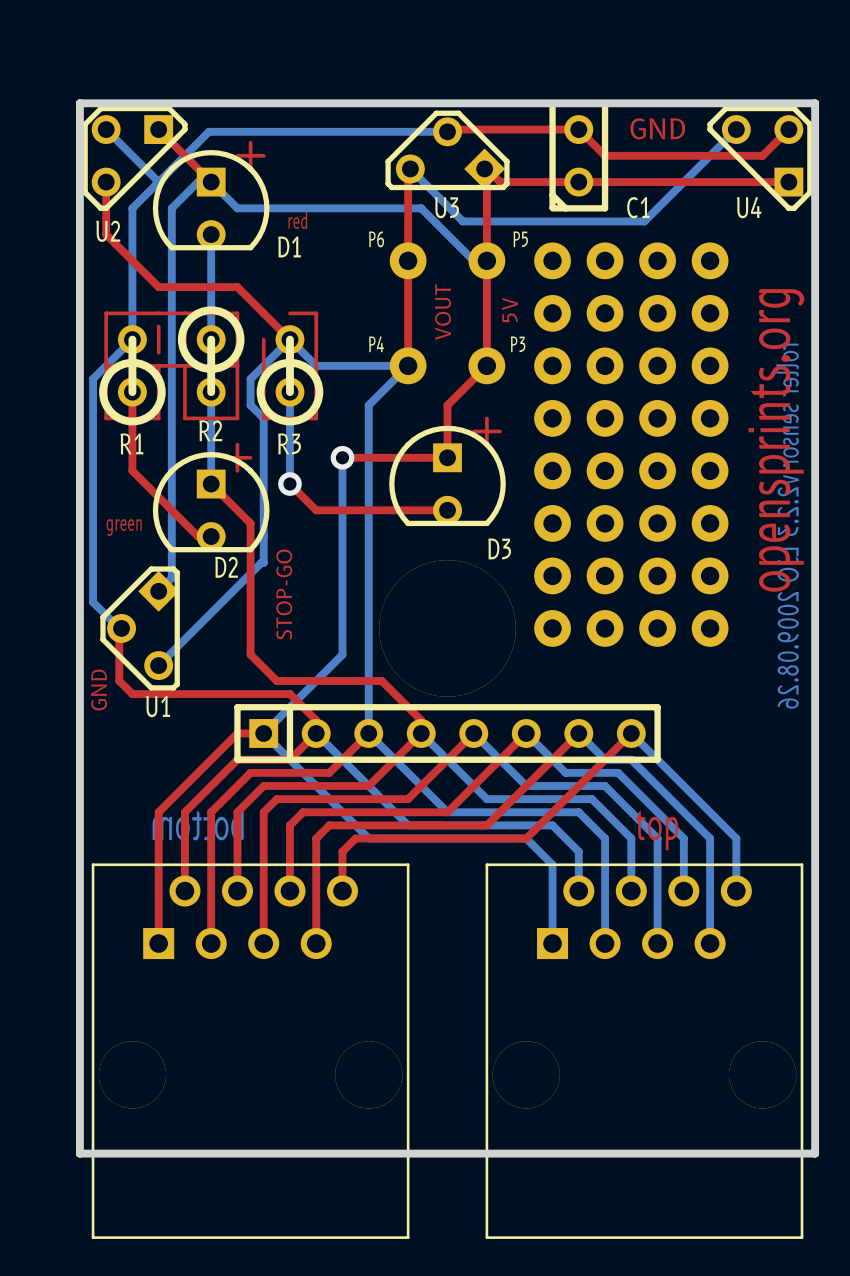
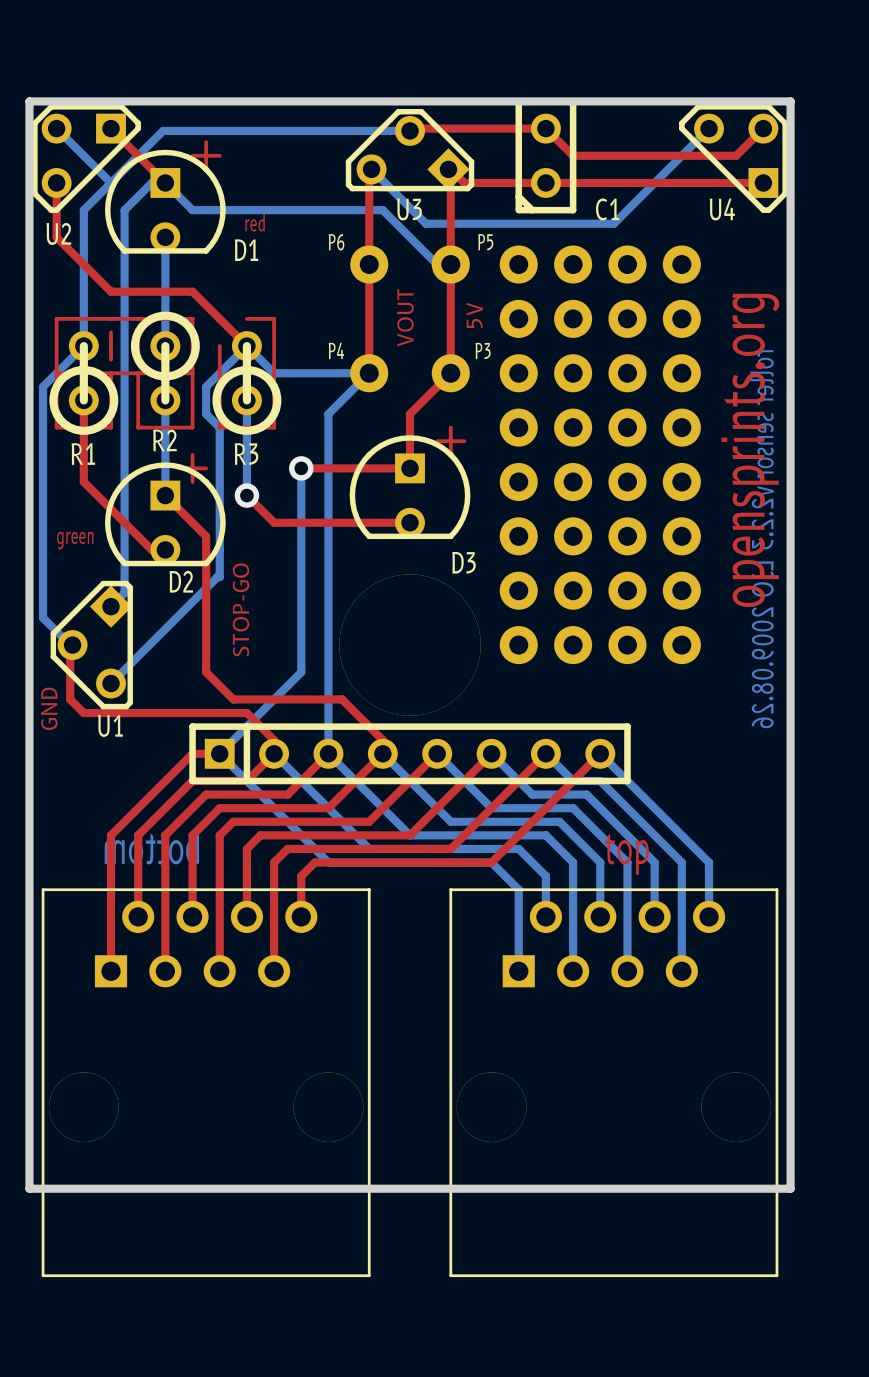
text: GND (657, 128) -> none

